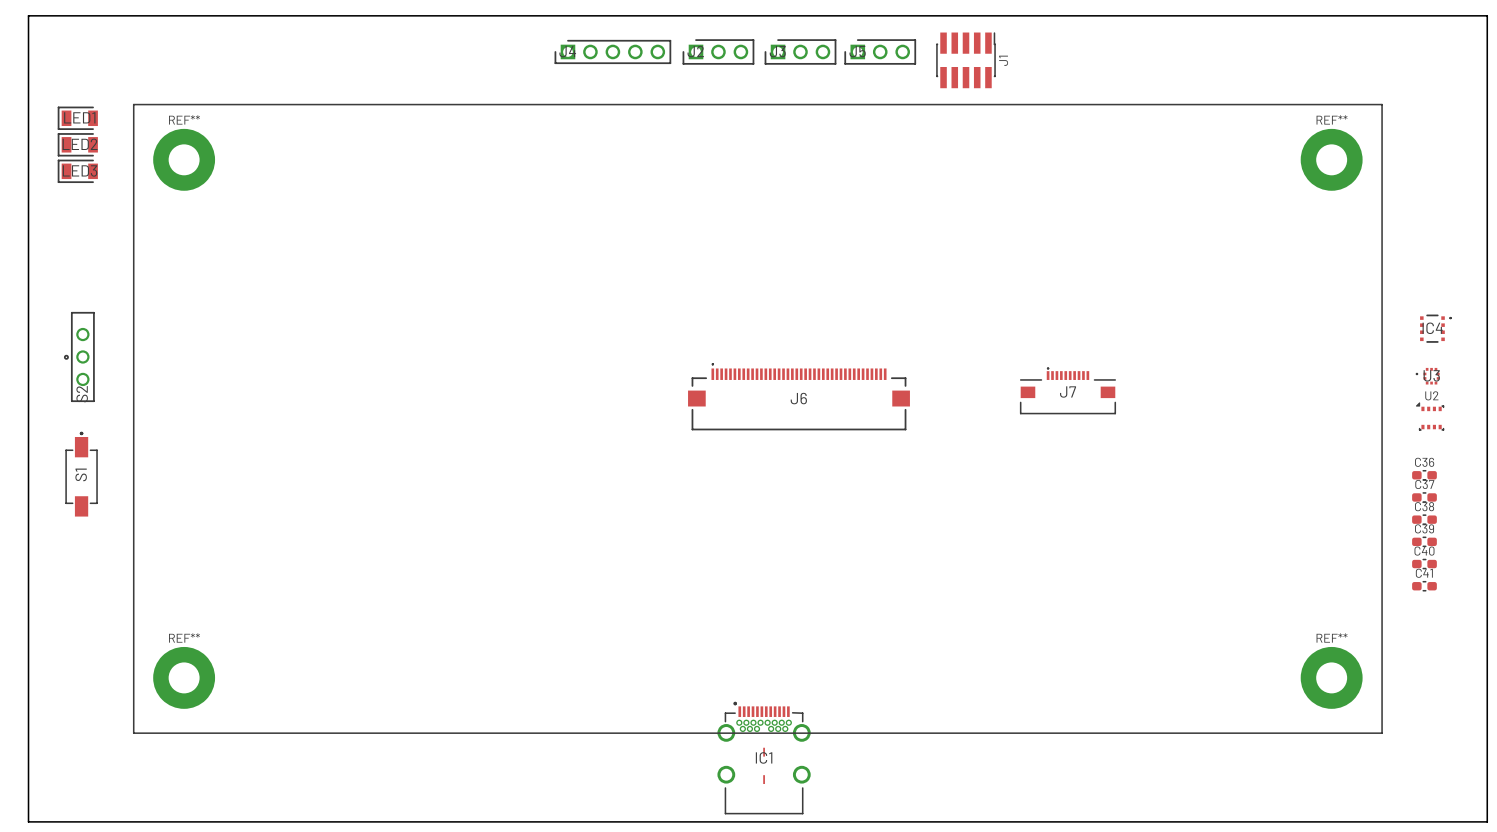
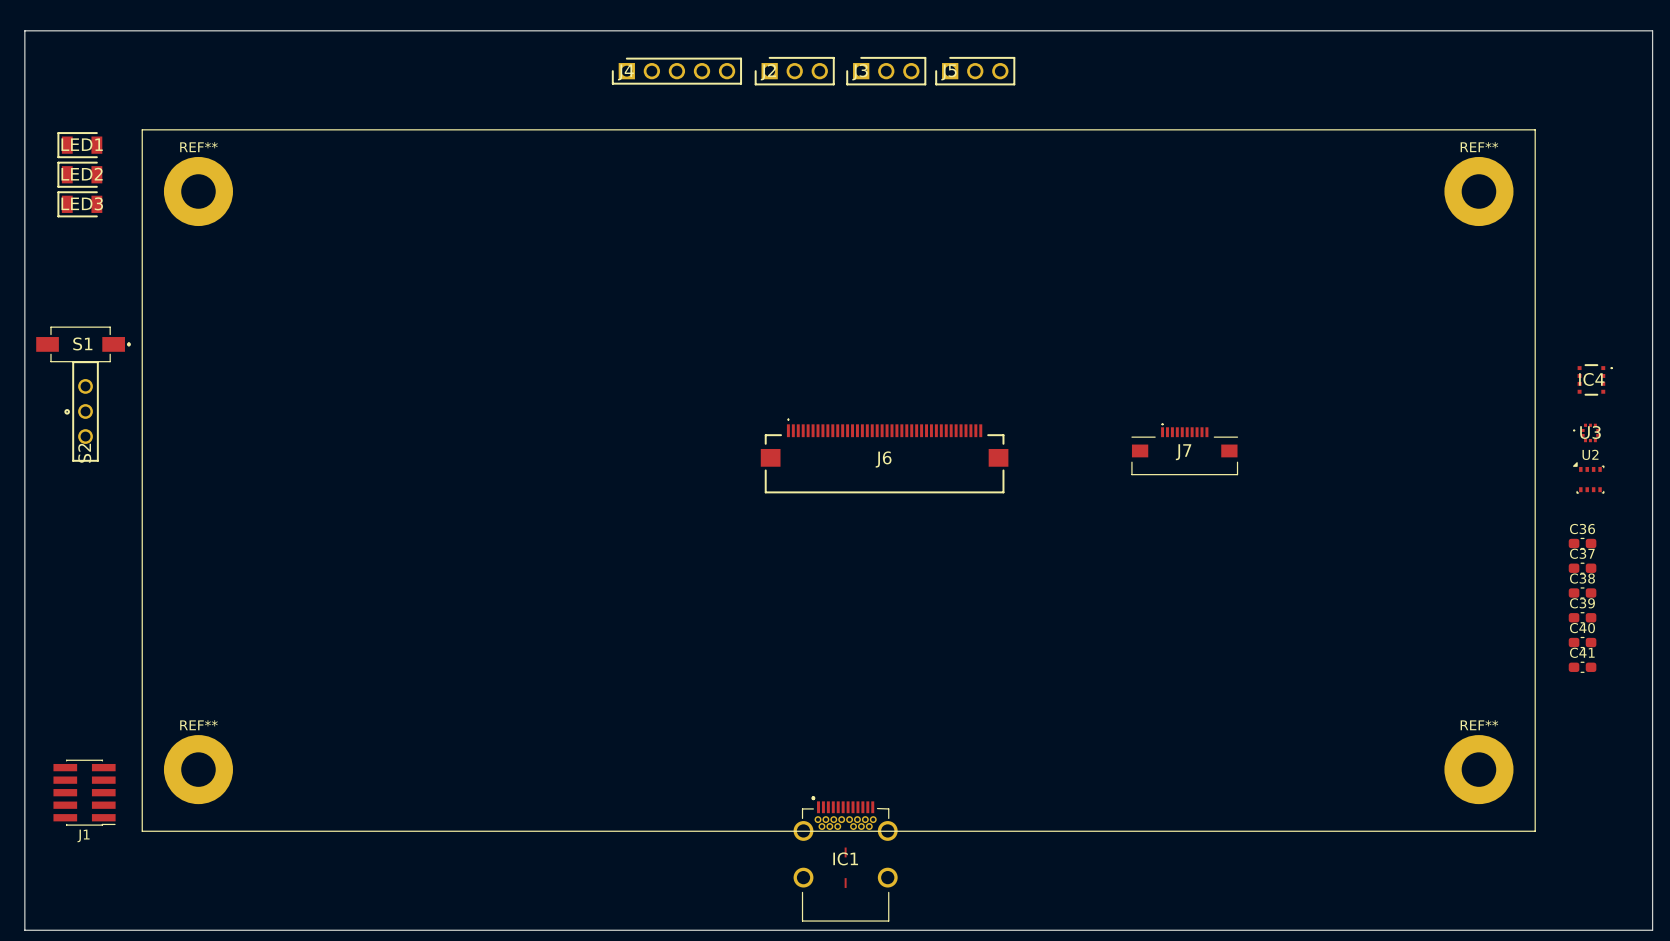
J1 rotation: 0° (966, 60) -> 90° clockwise (84, 792)
J1 position: (966, 60) -> (84, 792)
S1 rotation: 0° (81, 474) -> 90° clockwise (83, 344)
S1 position: (81, 474) -> (83, 344)

